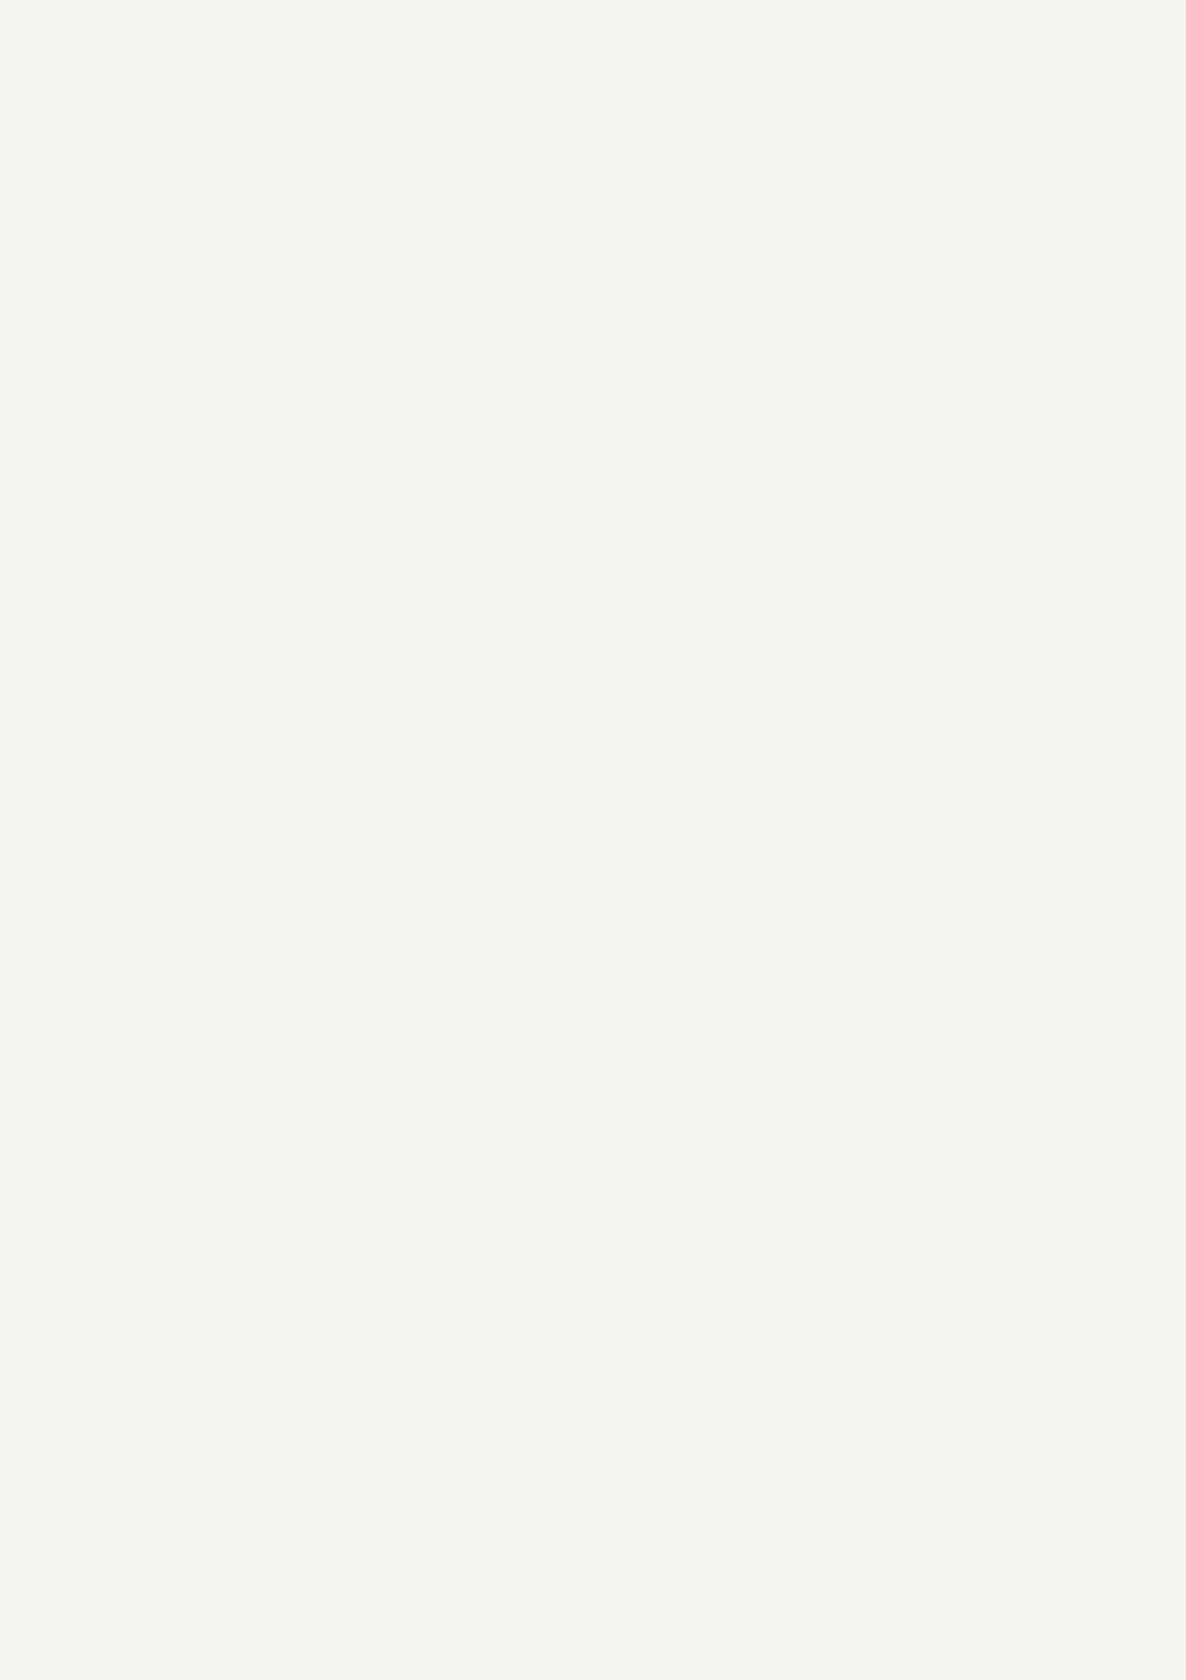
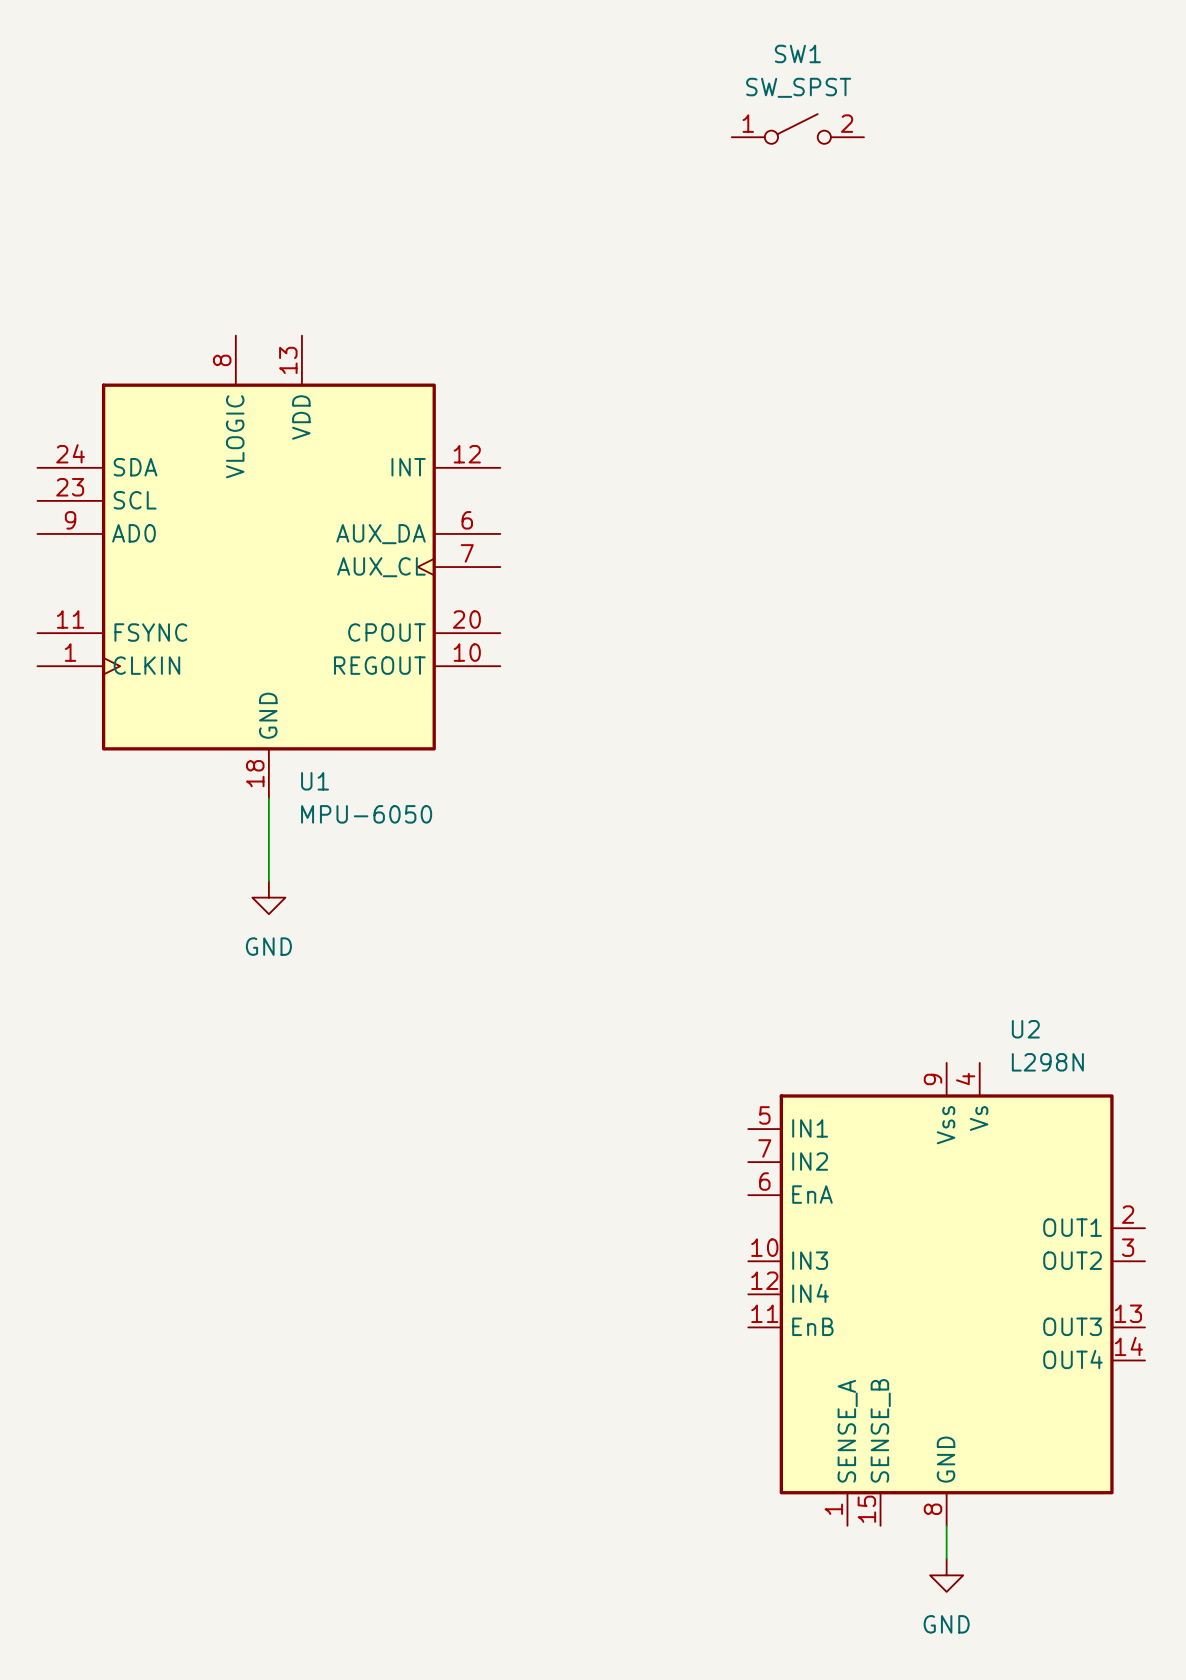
SW1: none -> SW_SPST (797, 128)
U1: none -> MPU-6050 (268, 567)
wire: none -> (268, 798) (268, 881)
power symbol: none -> GND (268, 897)
U2: none -> L298N (946, 1294)
wire: none -> (946, 1525) (946, 1558)
power symbol: none -> GND (946, 1575)

